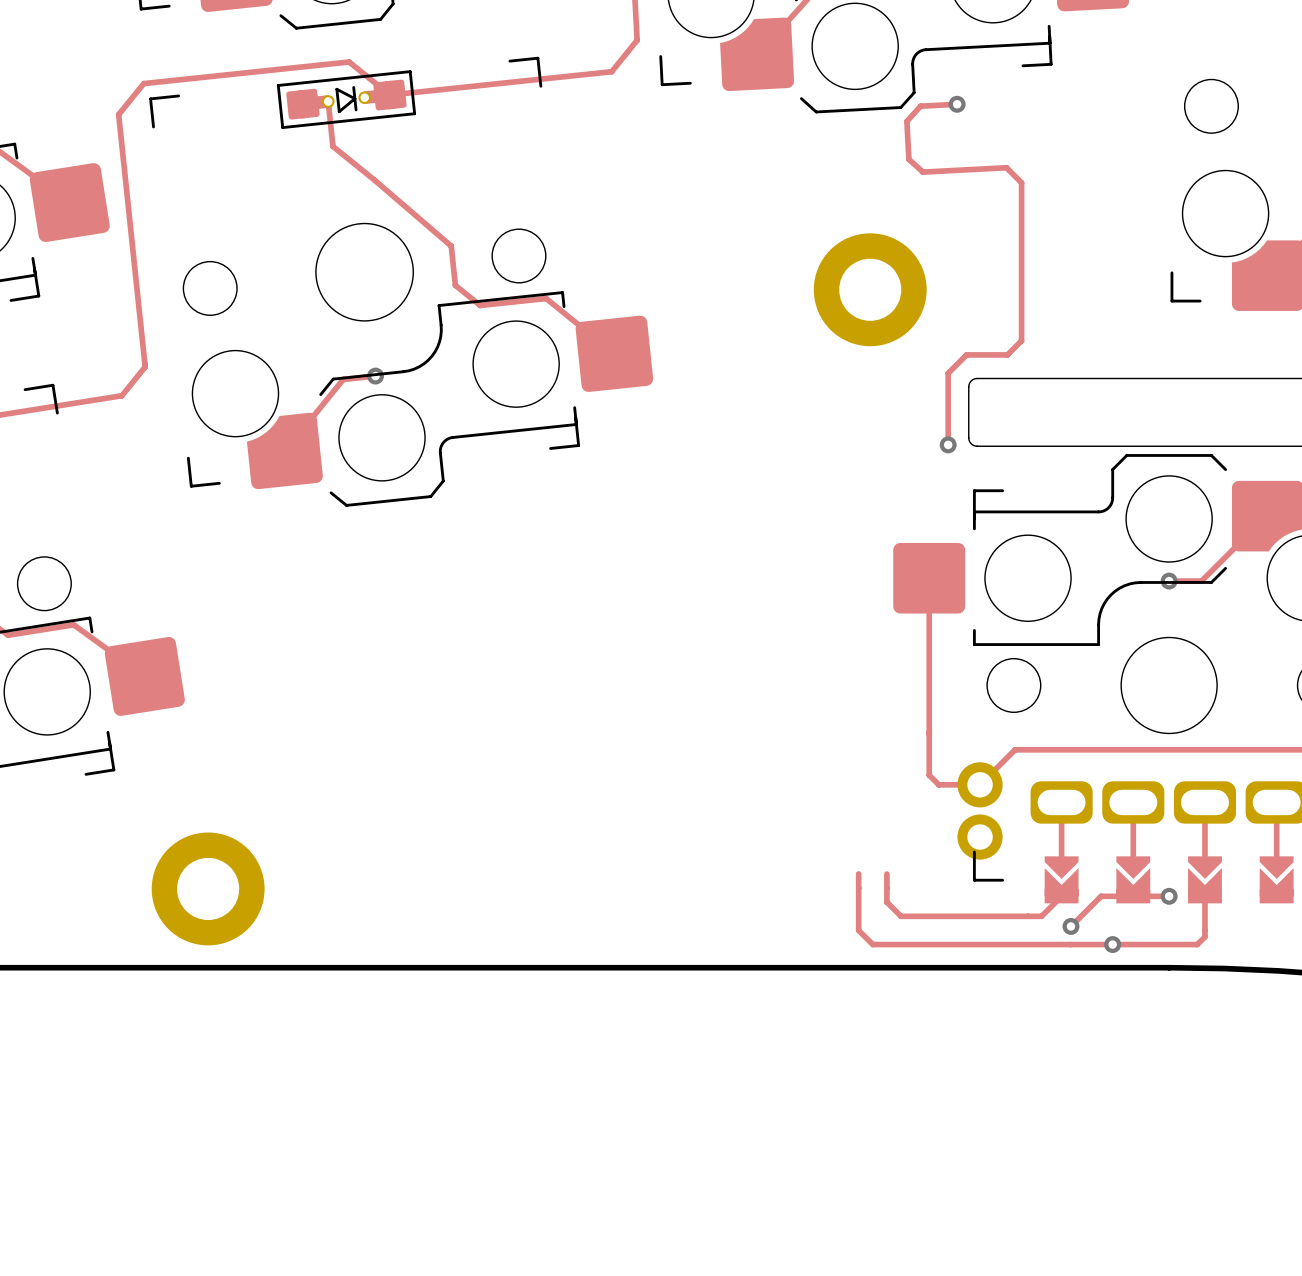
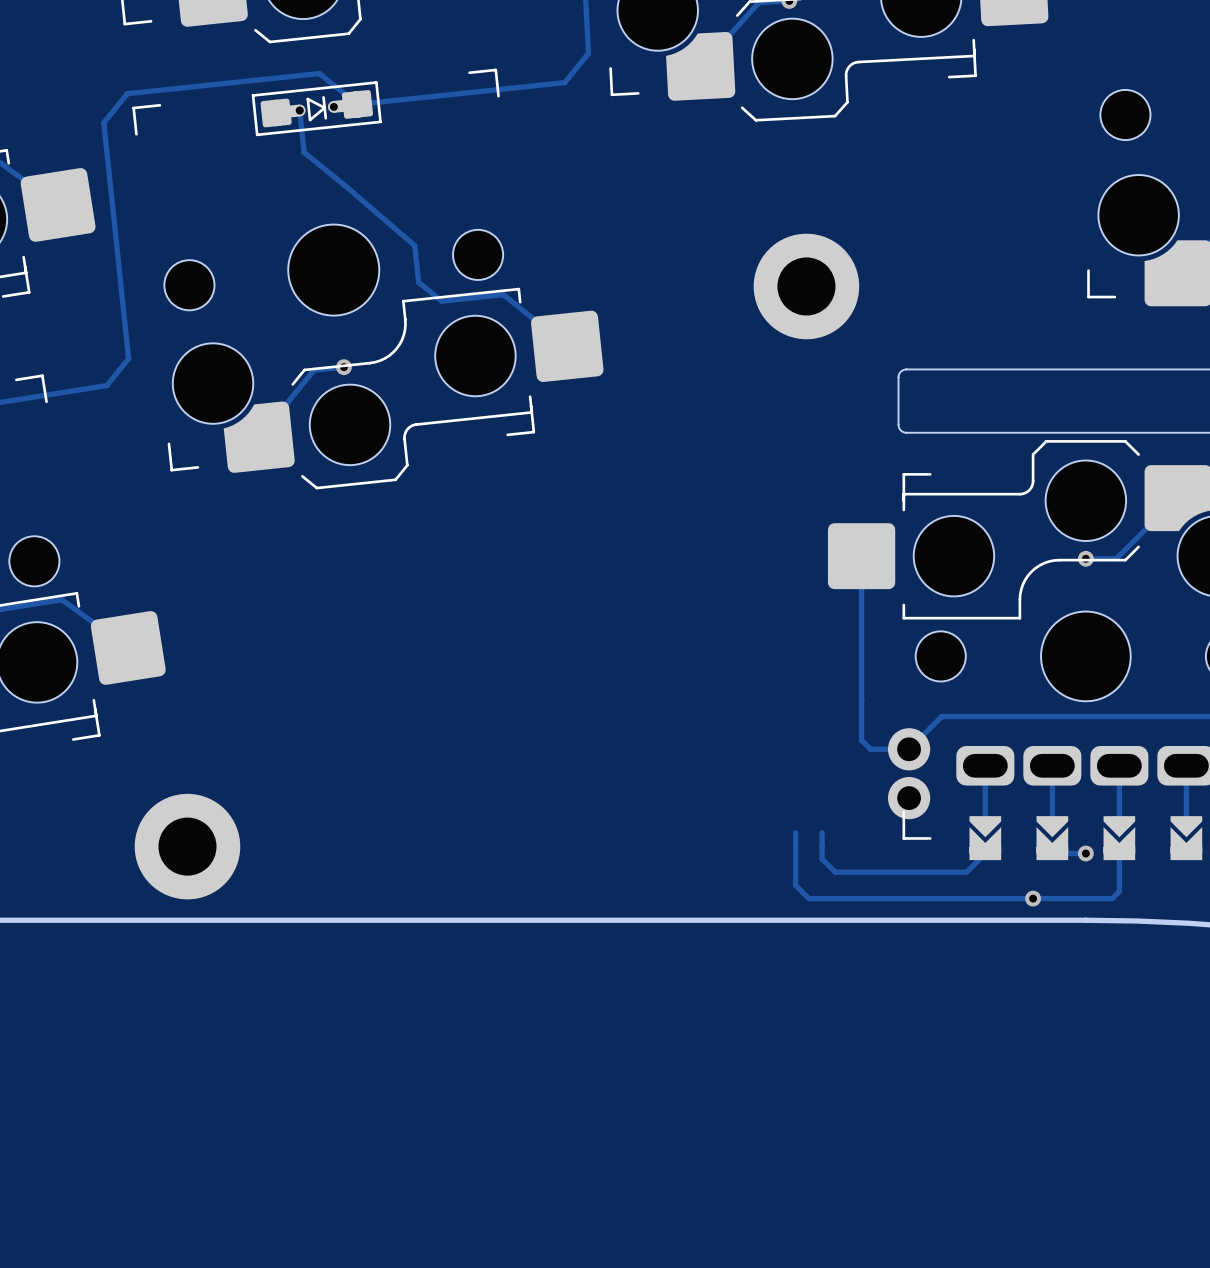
track: (957, 104) (920, 106) (906, 121) (908, 159) (923, 172) (1006, 167) -> none
via: (957, 104) -> none
track: (1006, 167) (1021, 182) (1021, 340) (1007, 354) (966, 354) (948, 373) (948, 444) -> none
via: (948, 444) -> none
track: (1133, 896) (1101, 896) (1070, 926) -> none
via: (1070, 926) -> none

